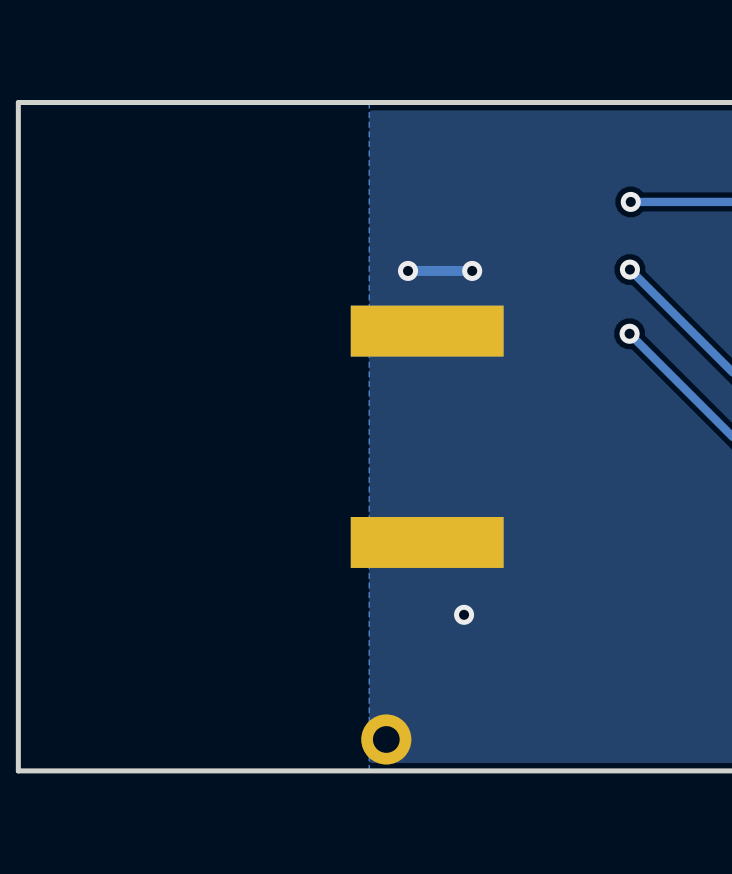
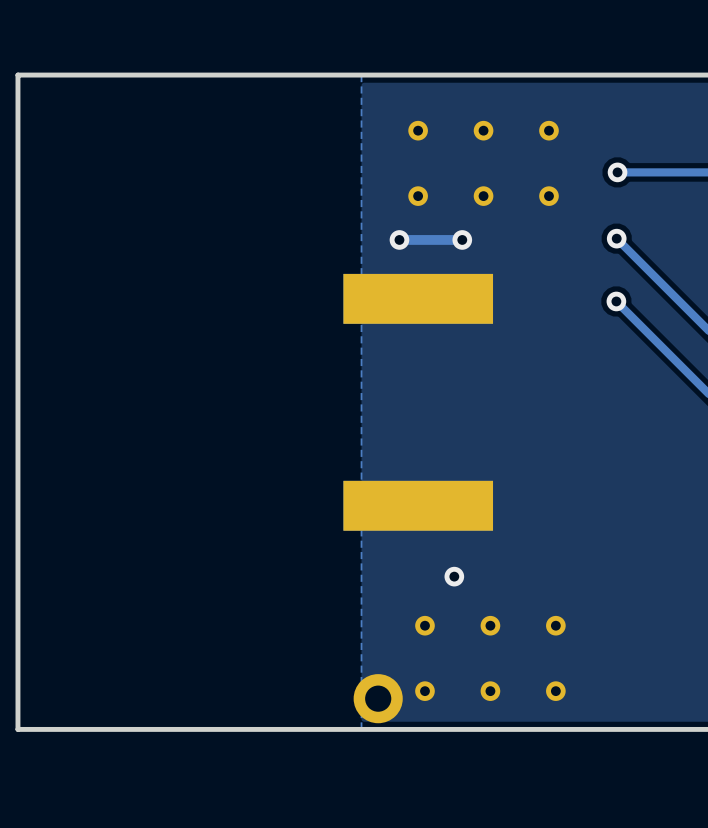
part: none -> (418, 130)
part: none -> (483, 130)
part: none -> (548, 130)
part: none -> (418, 196)
part: none -> (483, 196)
part: none -> (548, 196)
part: none -> (424, 625)
part: none -> (490, 625)
part: none -> (555, 625)
part: none -> (424, 691)
part: none -> (490, 691)
part: none -> (555, 691)

